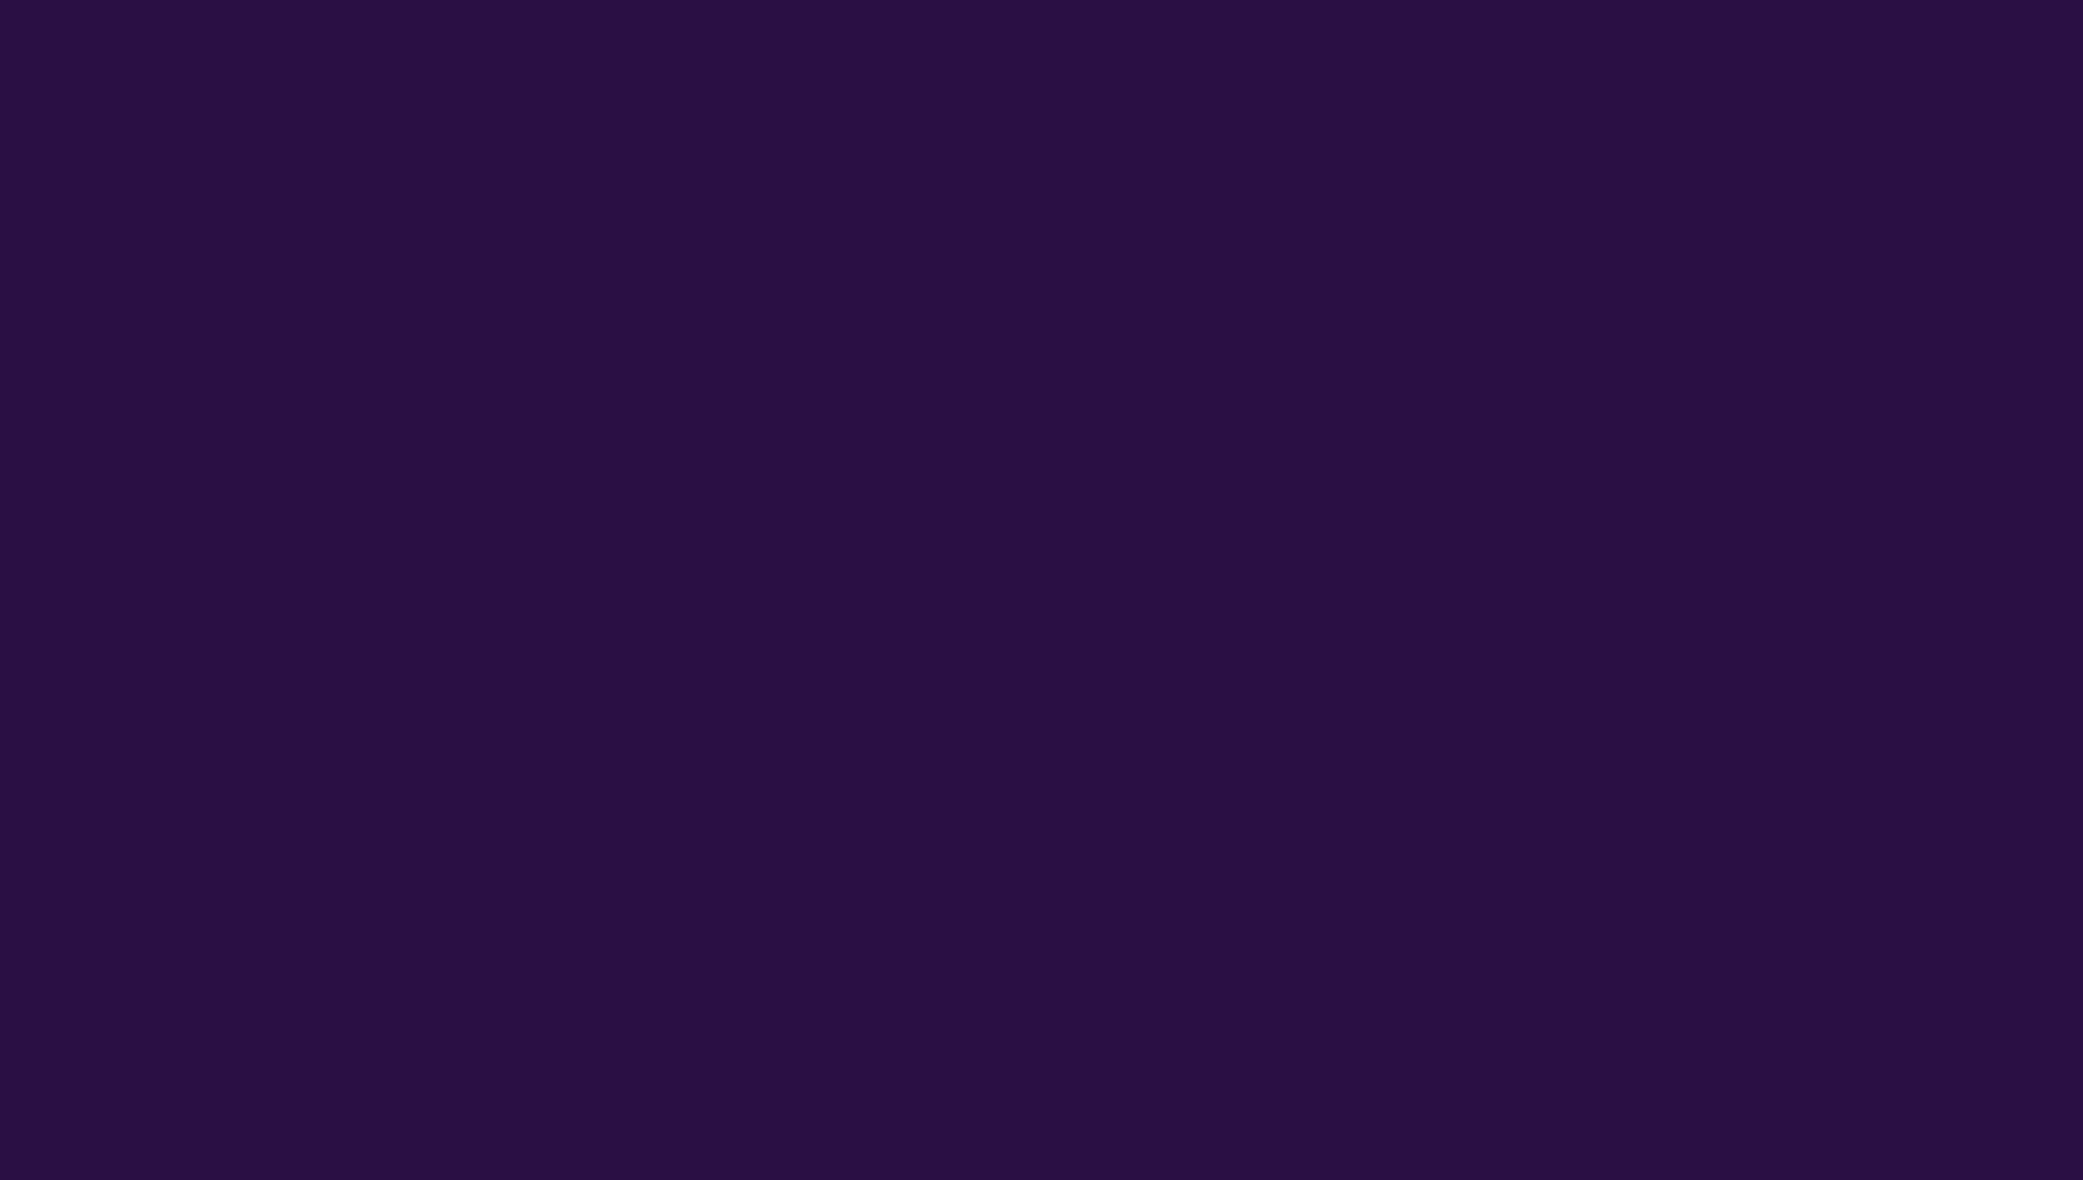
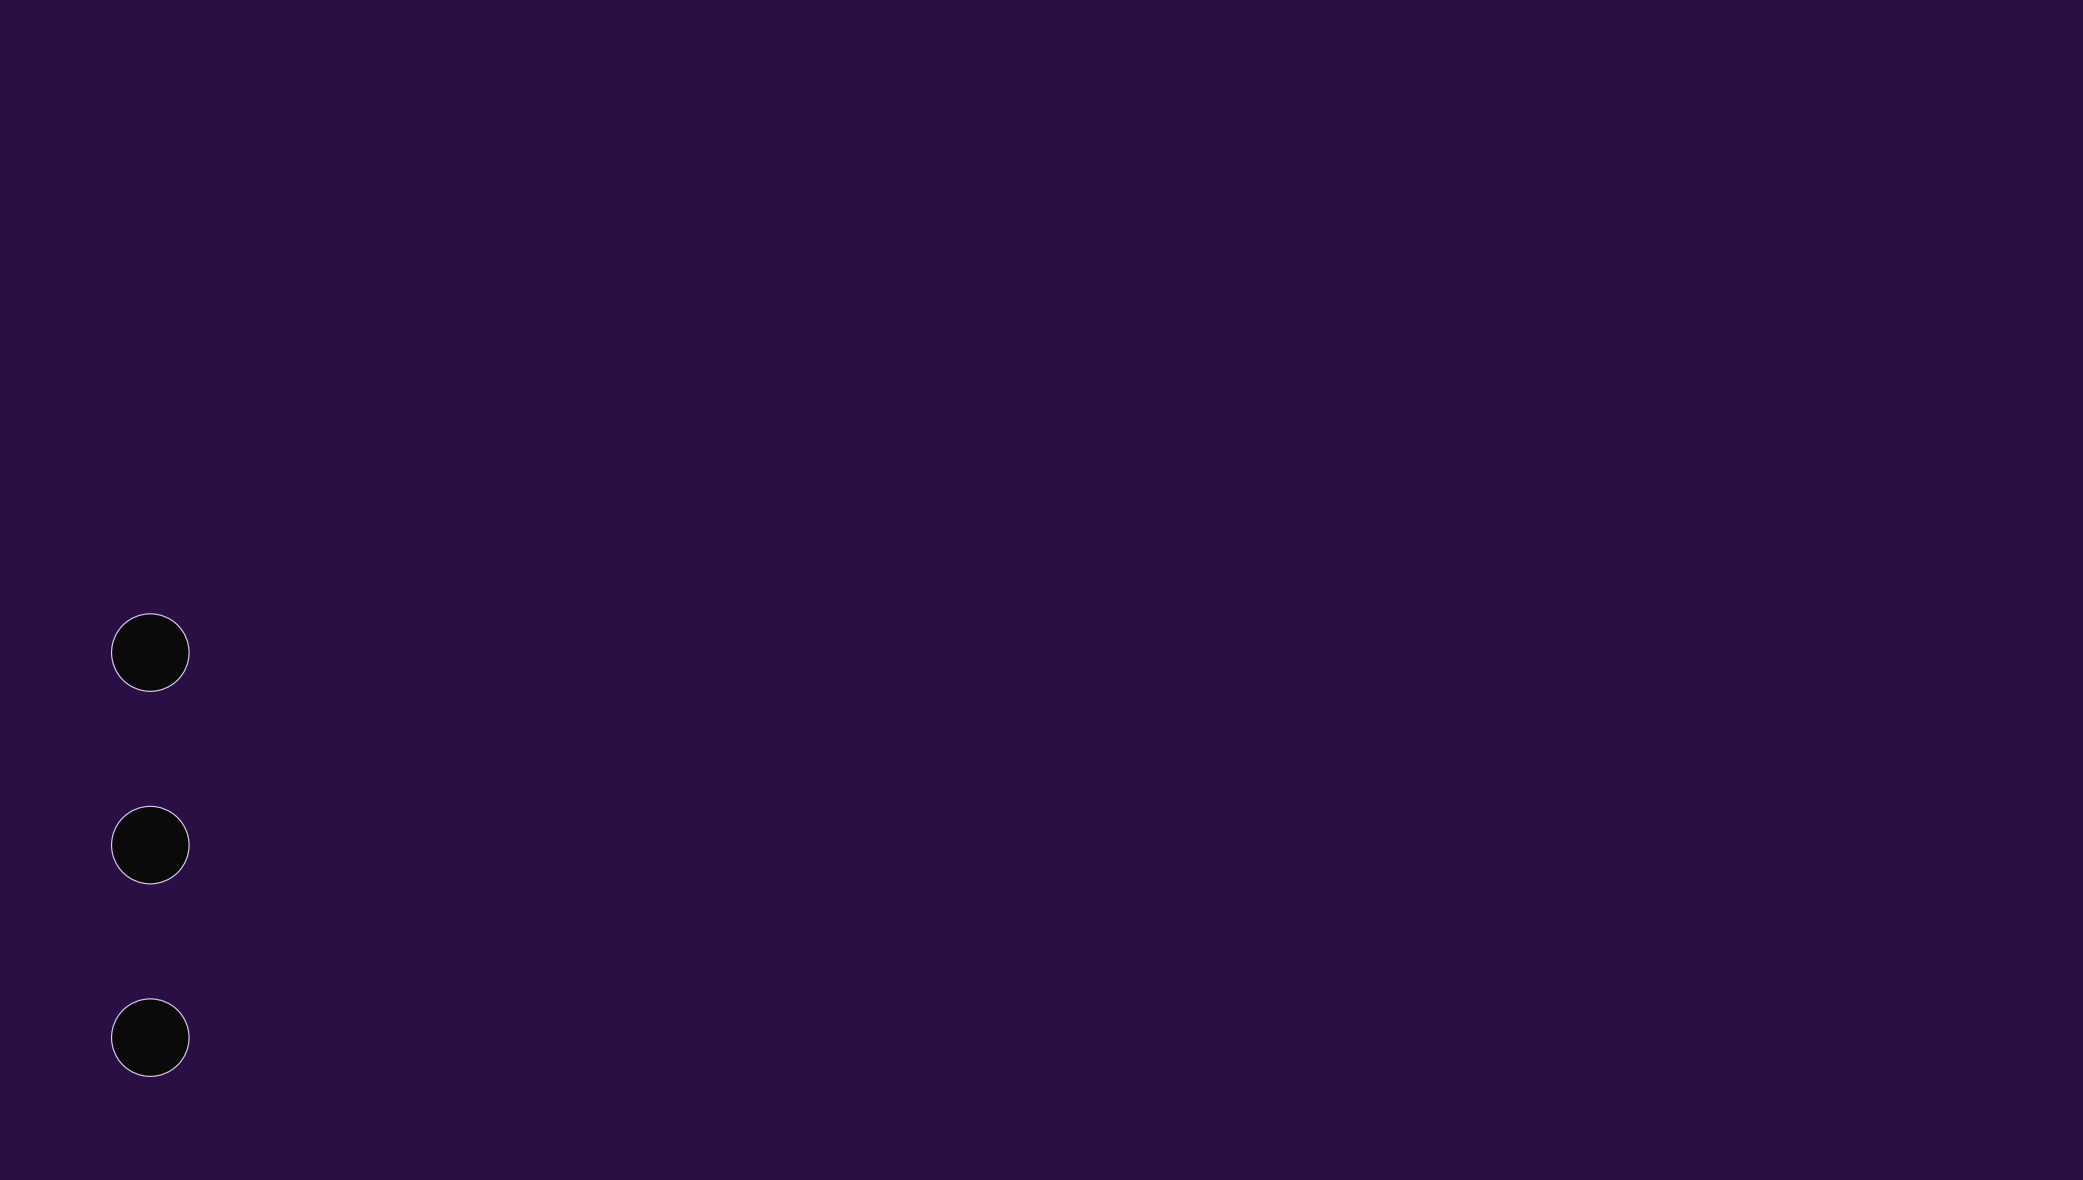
part: none -> (150, 652)
part: none -> (150, 845)
part: none -> (150, 1037)

